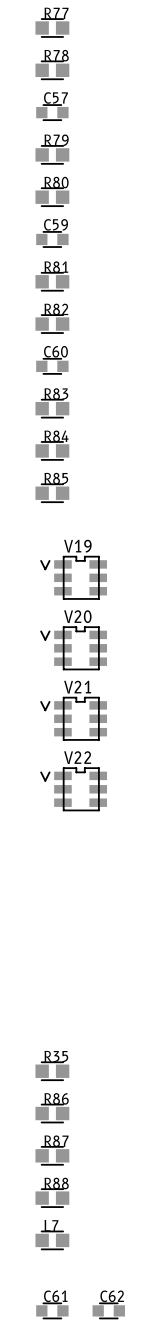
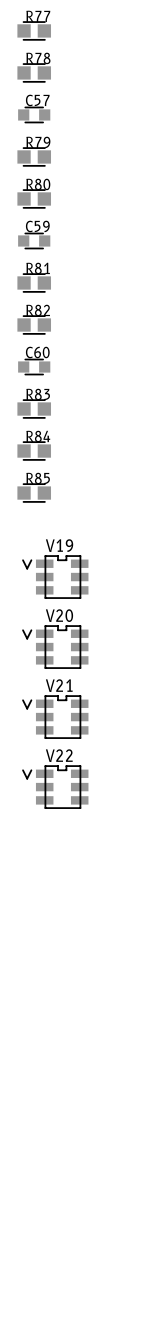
R35: (52, 1071) -> none
R86: (52, 1113) -> none
R87: (52, 1155) -> none
R88: (52, 1198) -> none
L7: (52, 1240) -> none
C61: (52, 1310) -> none
C62: (108, 1310) -> none

